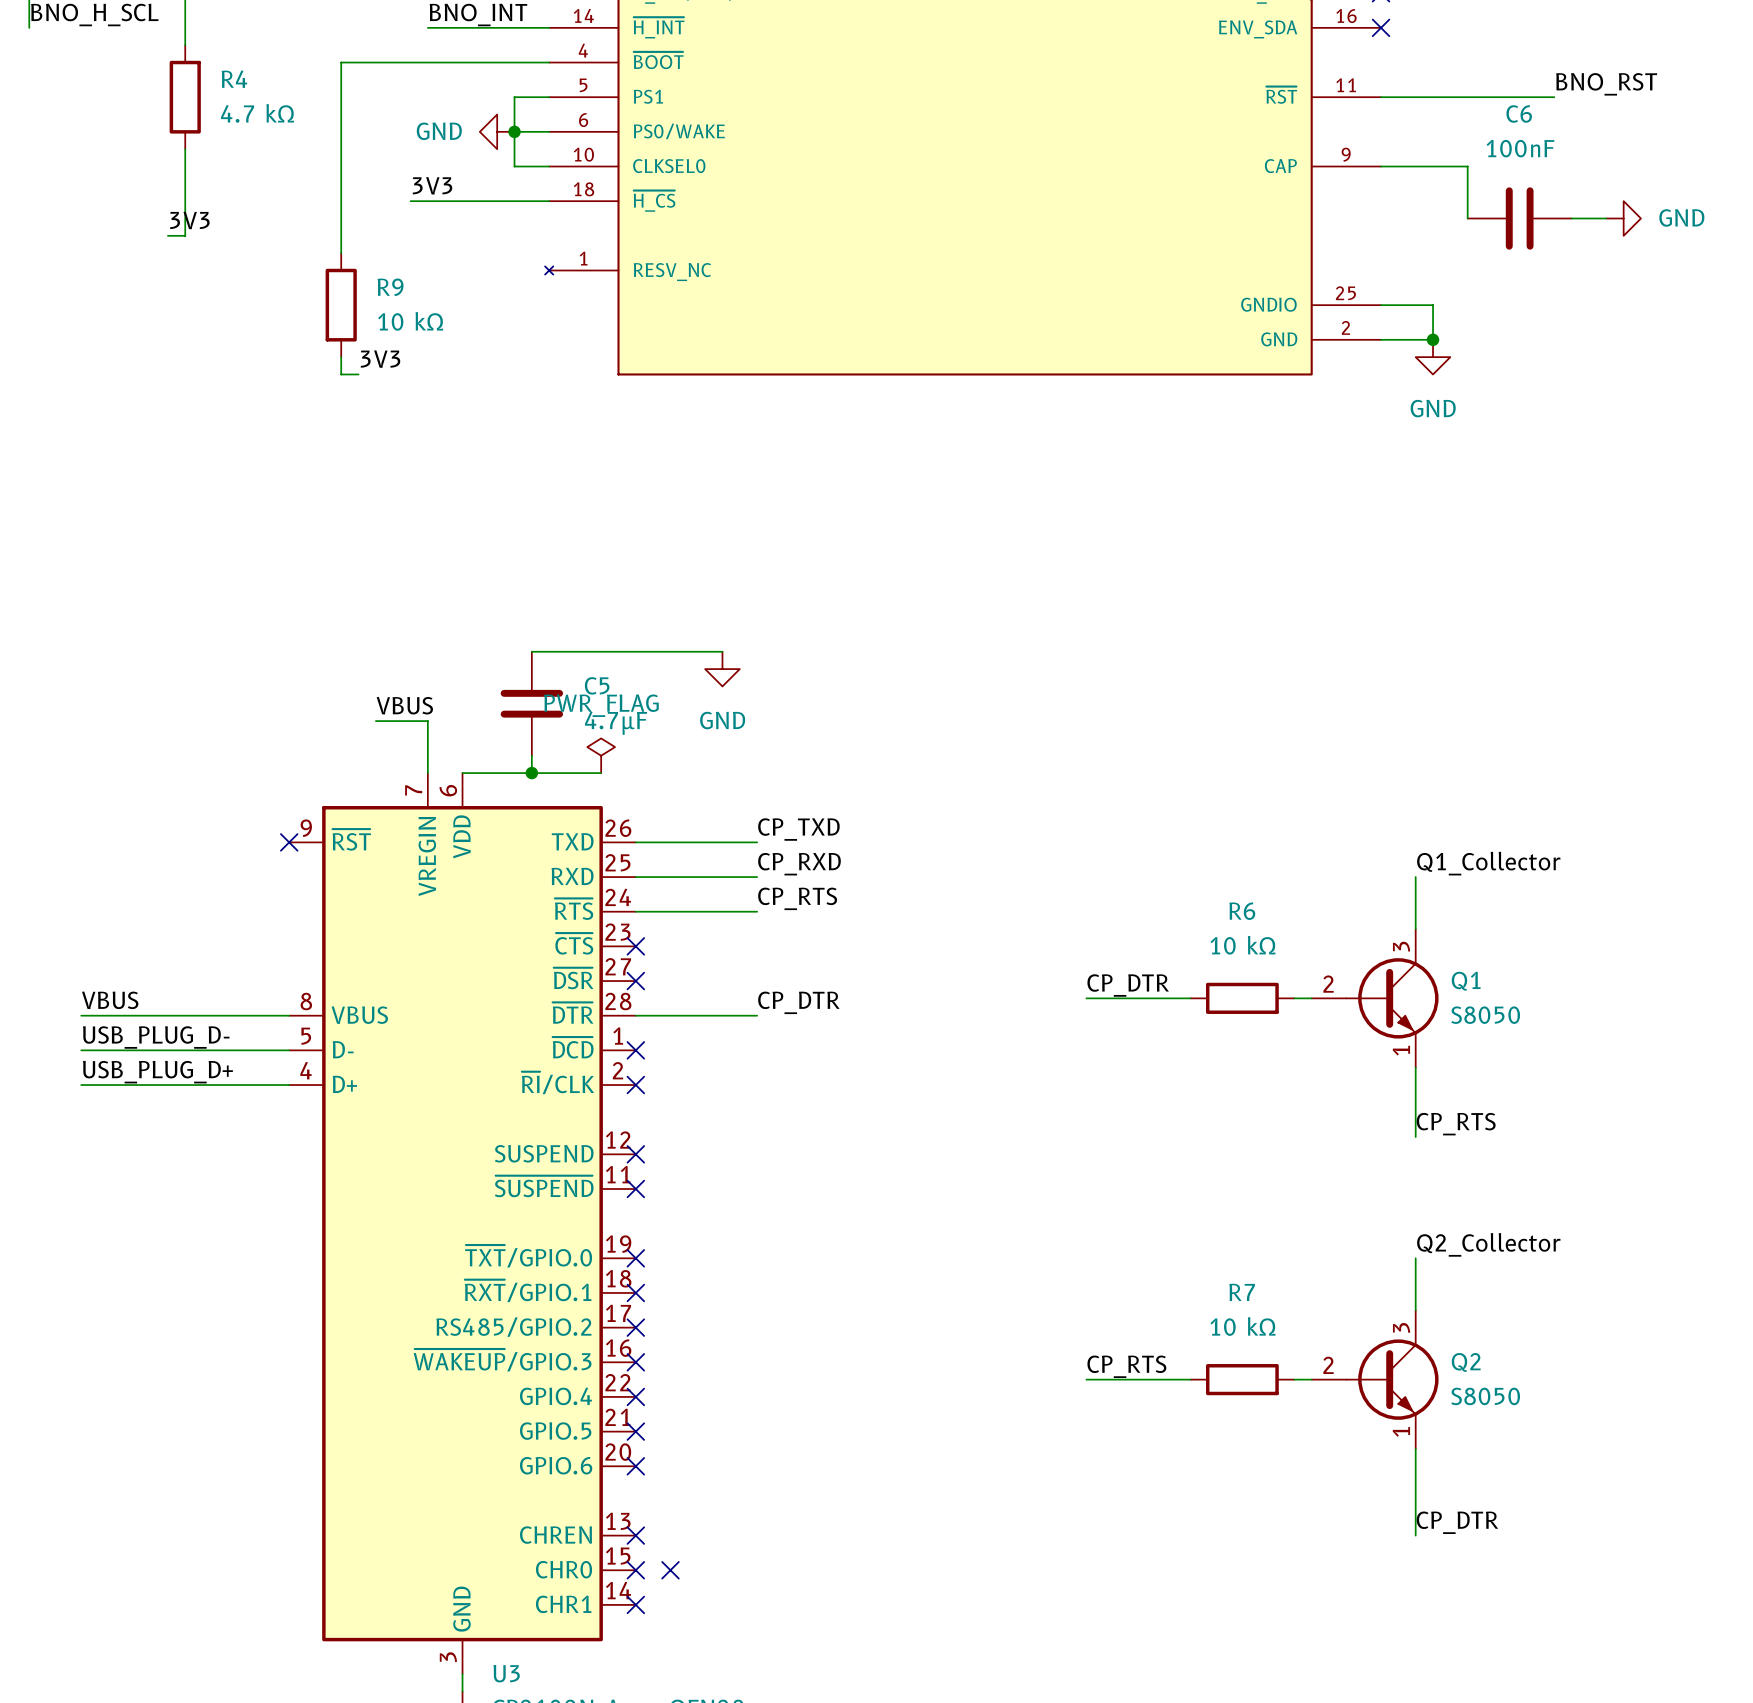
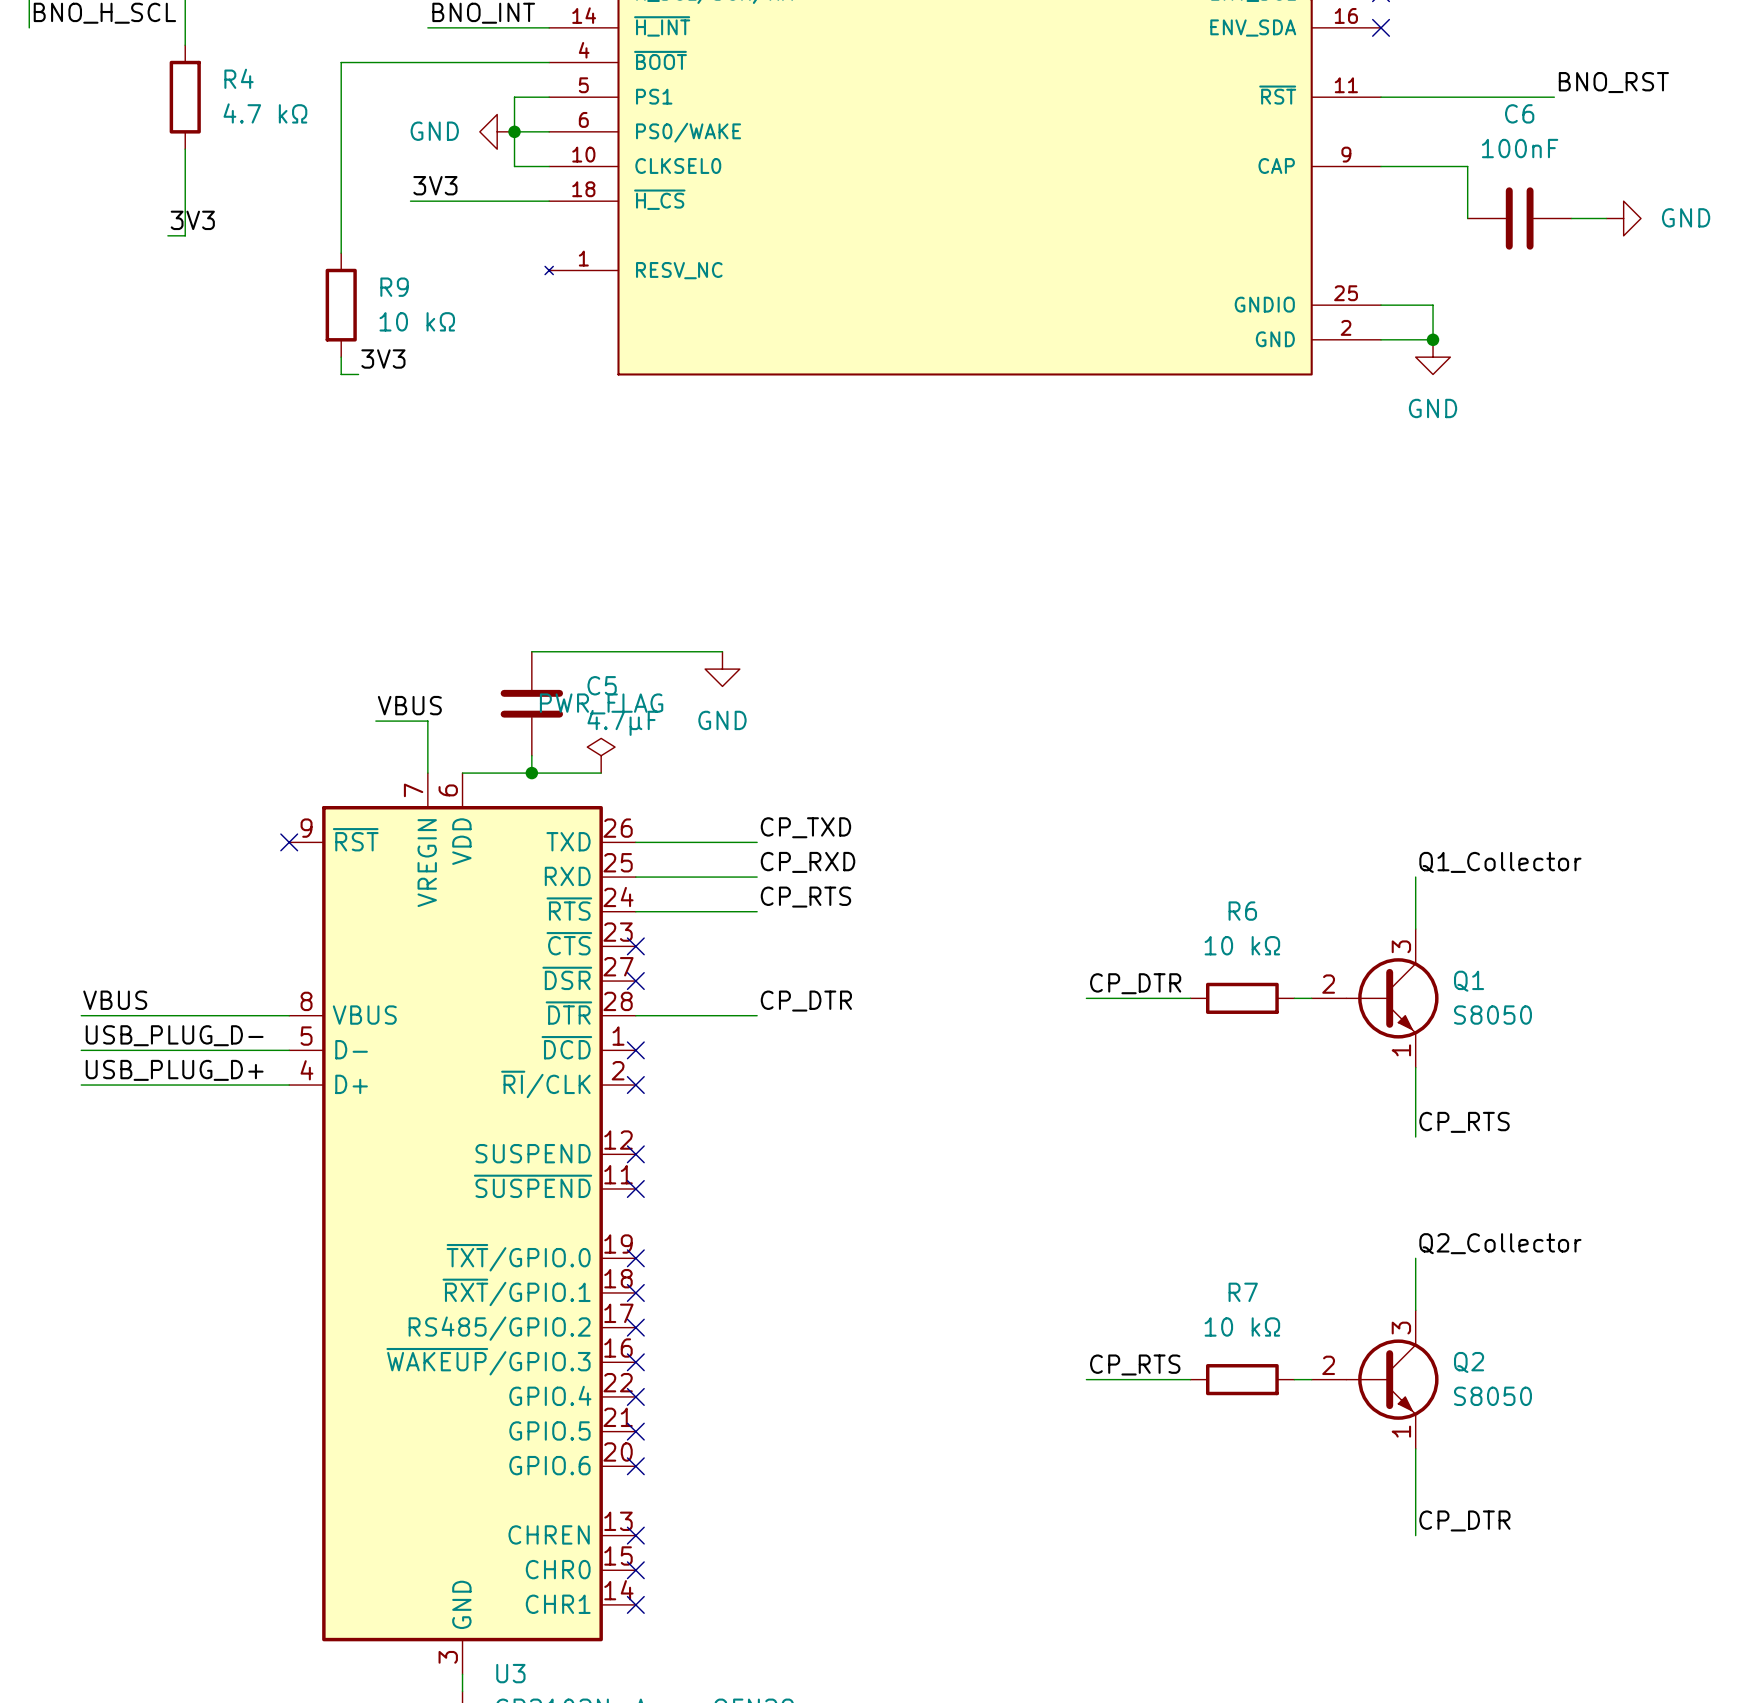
no-connect mark: (670, 1570) -> none

